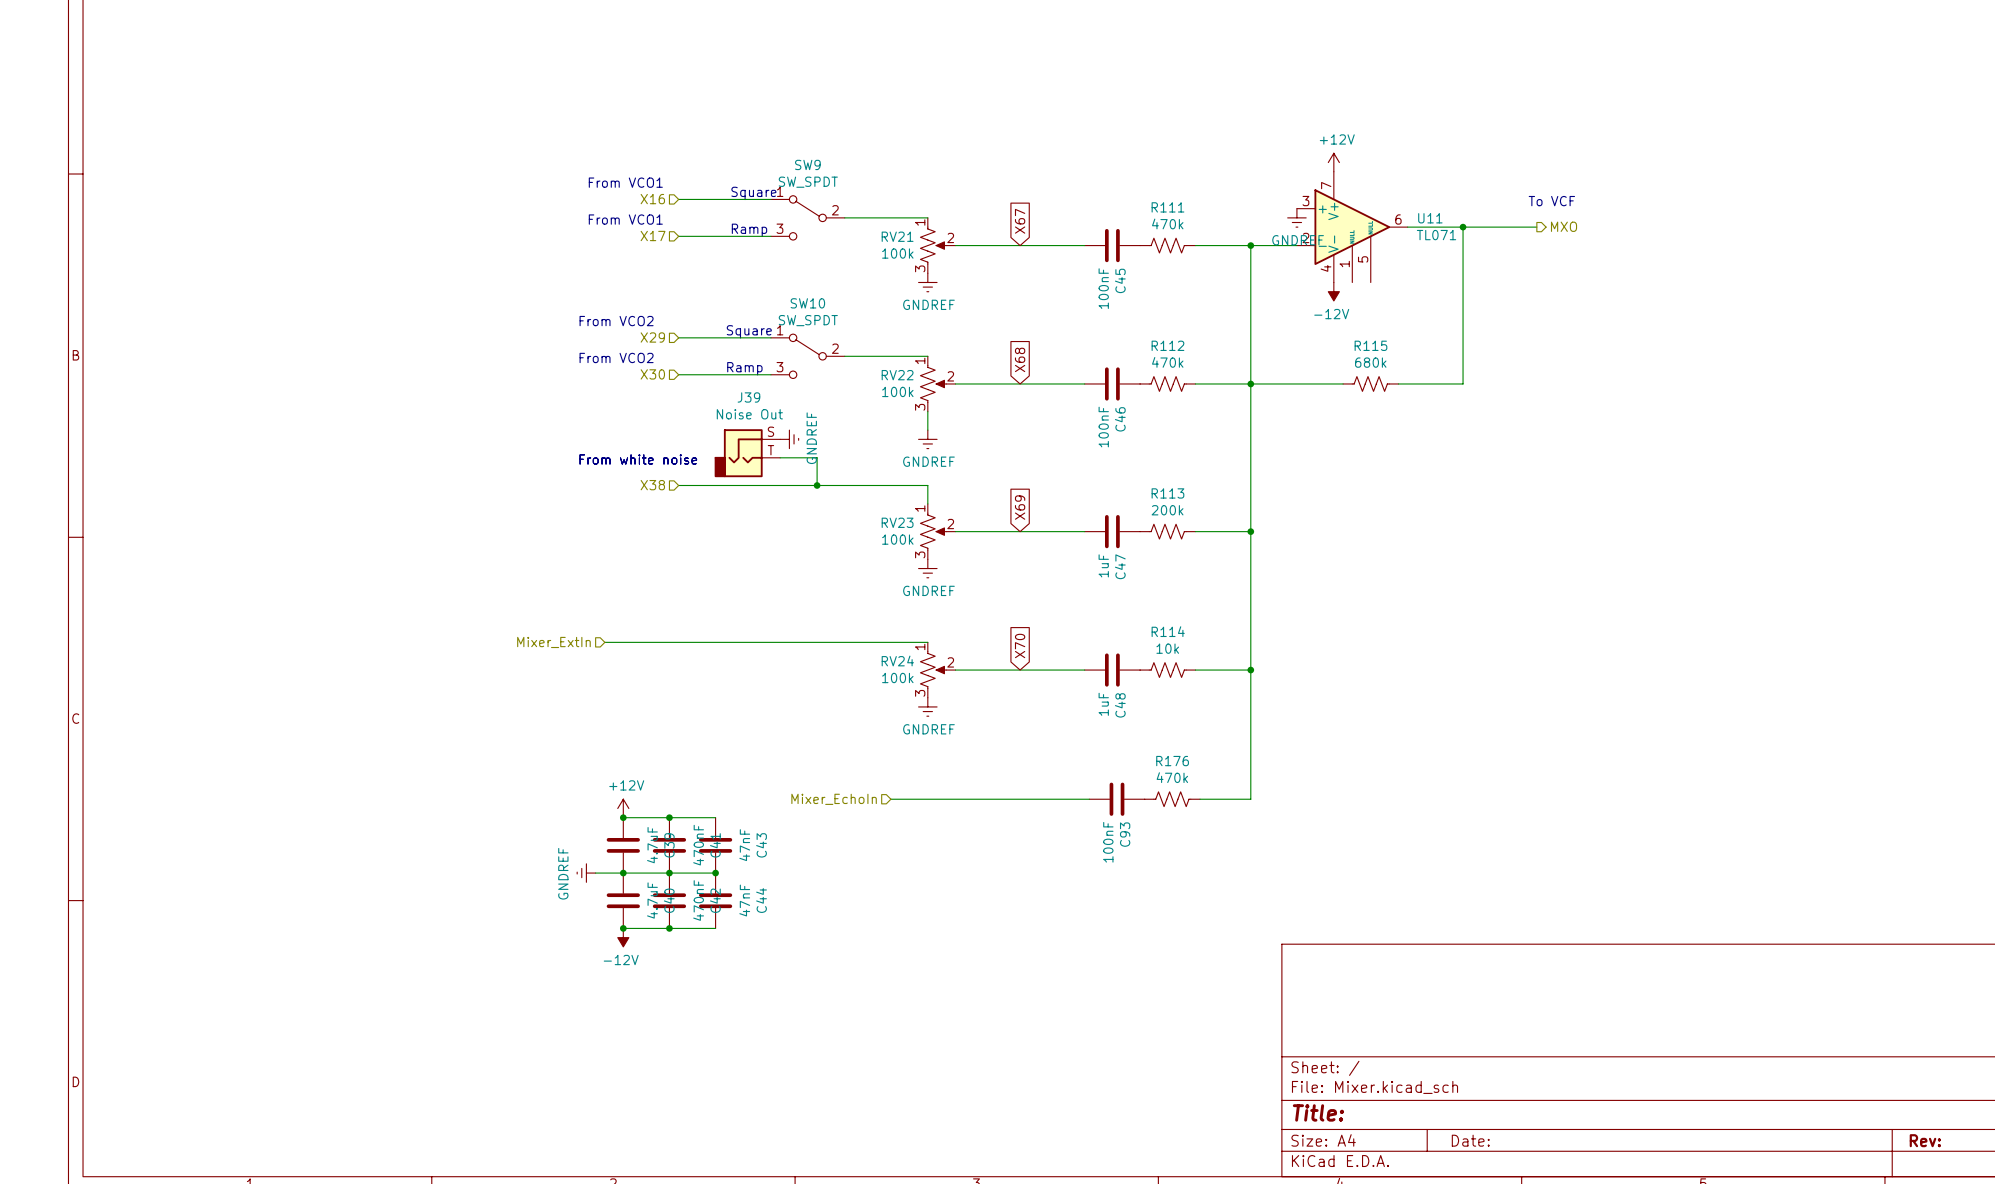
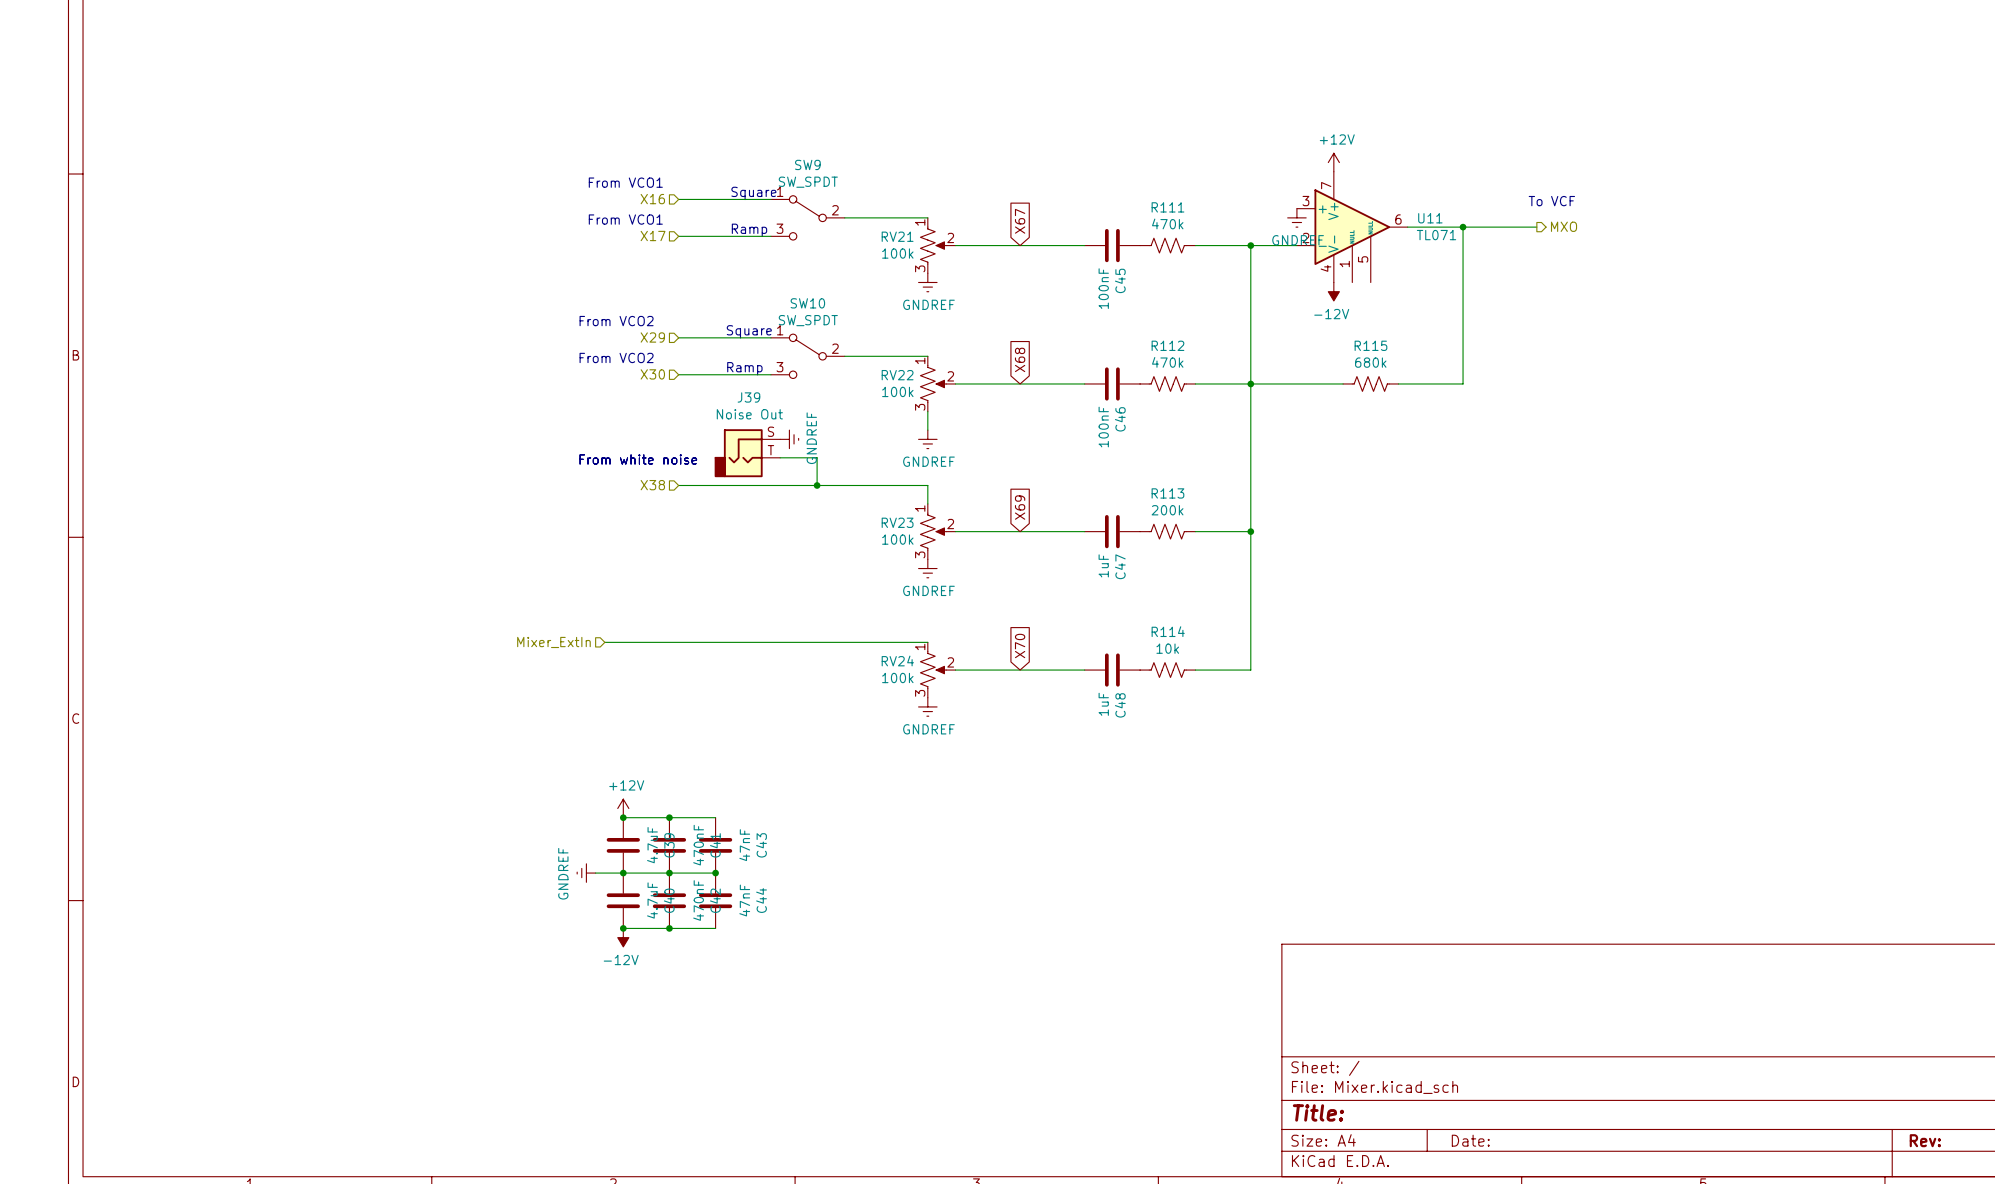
wire: (1250, 670) (1250, 799) (1200, 799) -> none
junction: (1250, 670) -> none
hierarchical label: Mixer_EchoIn (834, 799) -> none
wire: (890, 799) (1089, 799) -> none
C93: 100nF (1116, 799) -> none
R176: 470k (1172, 799) -> none

